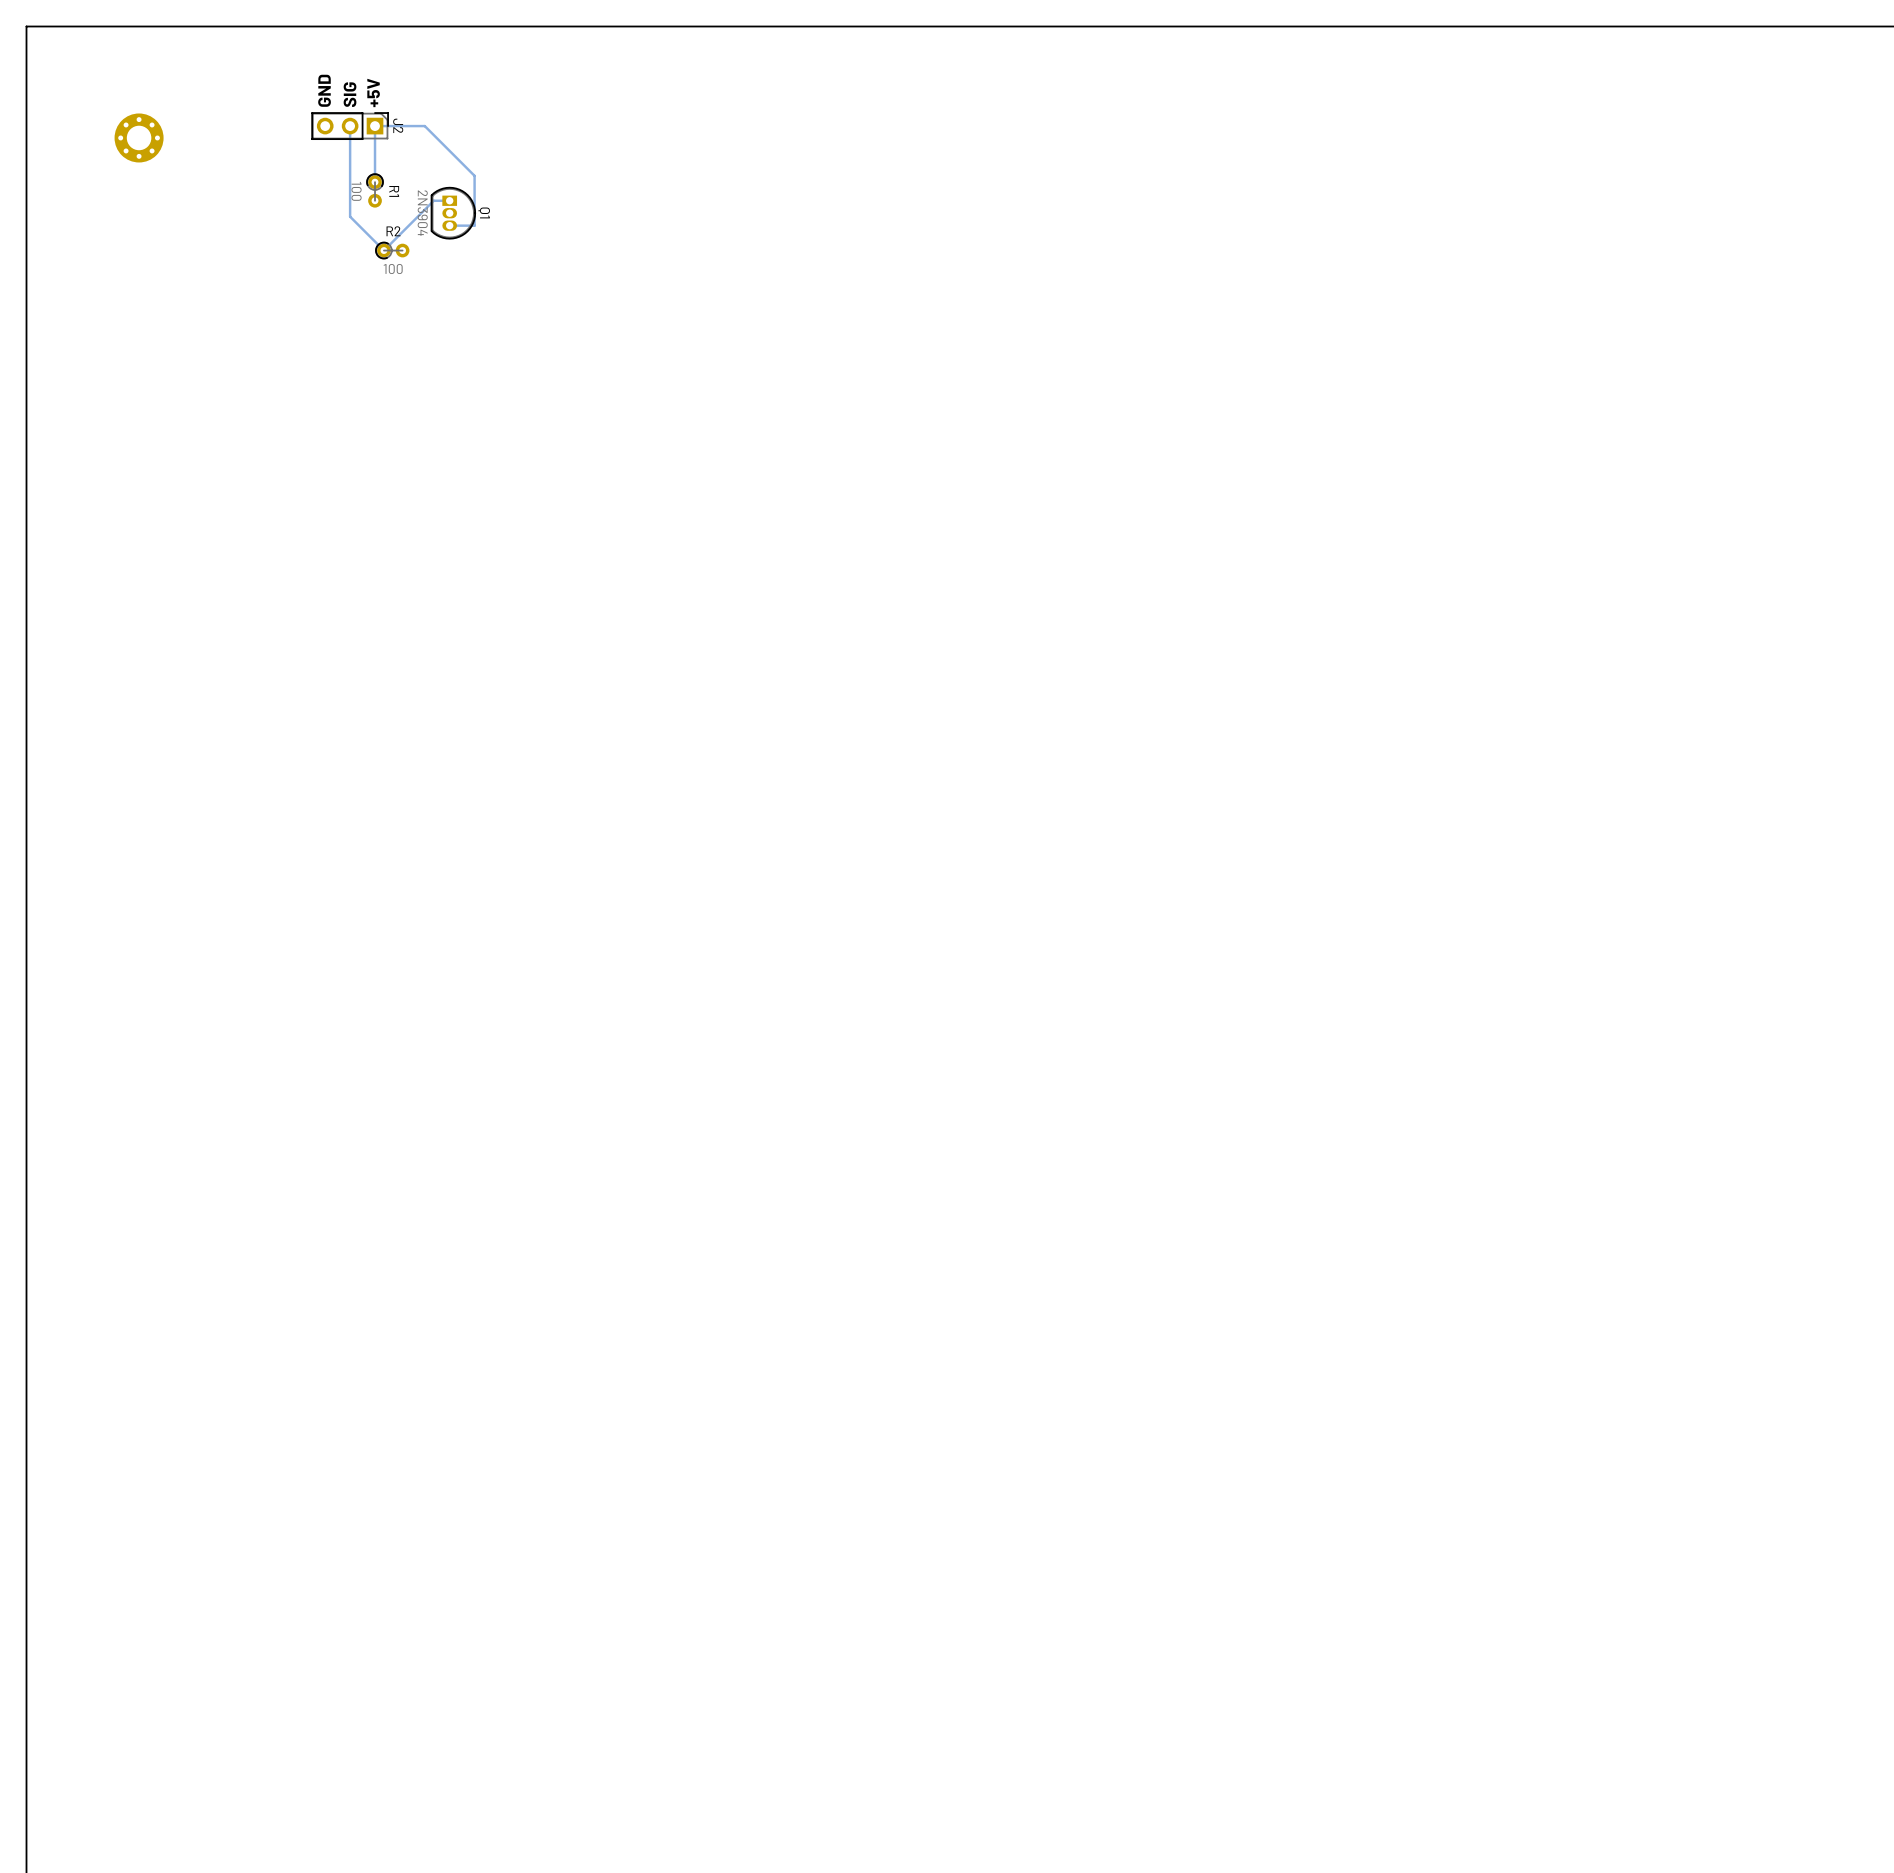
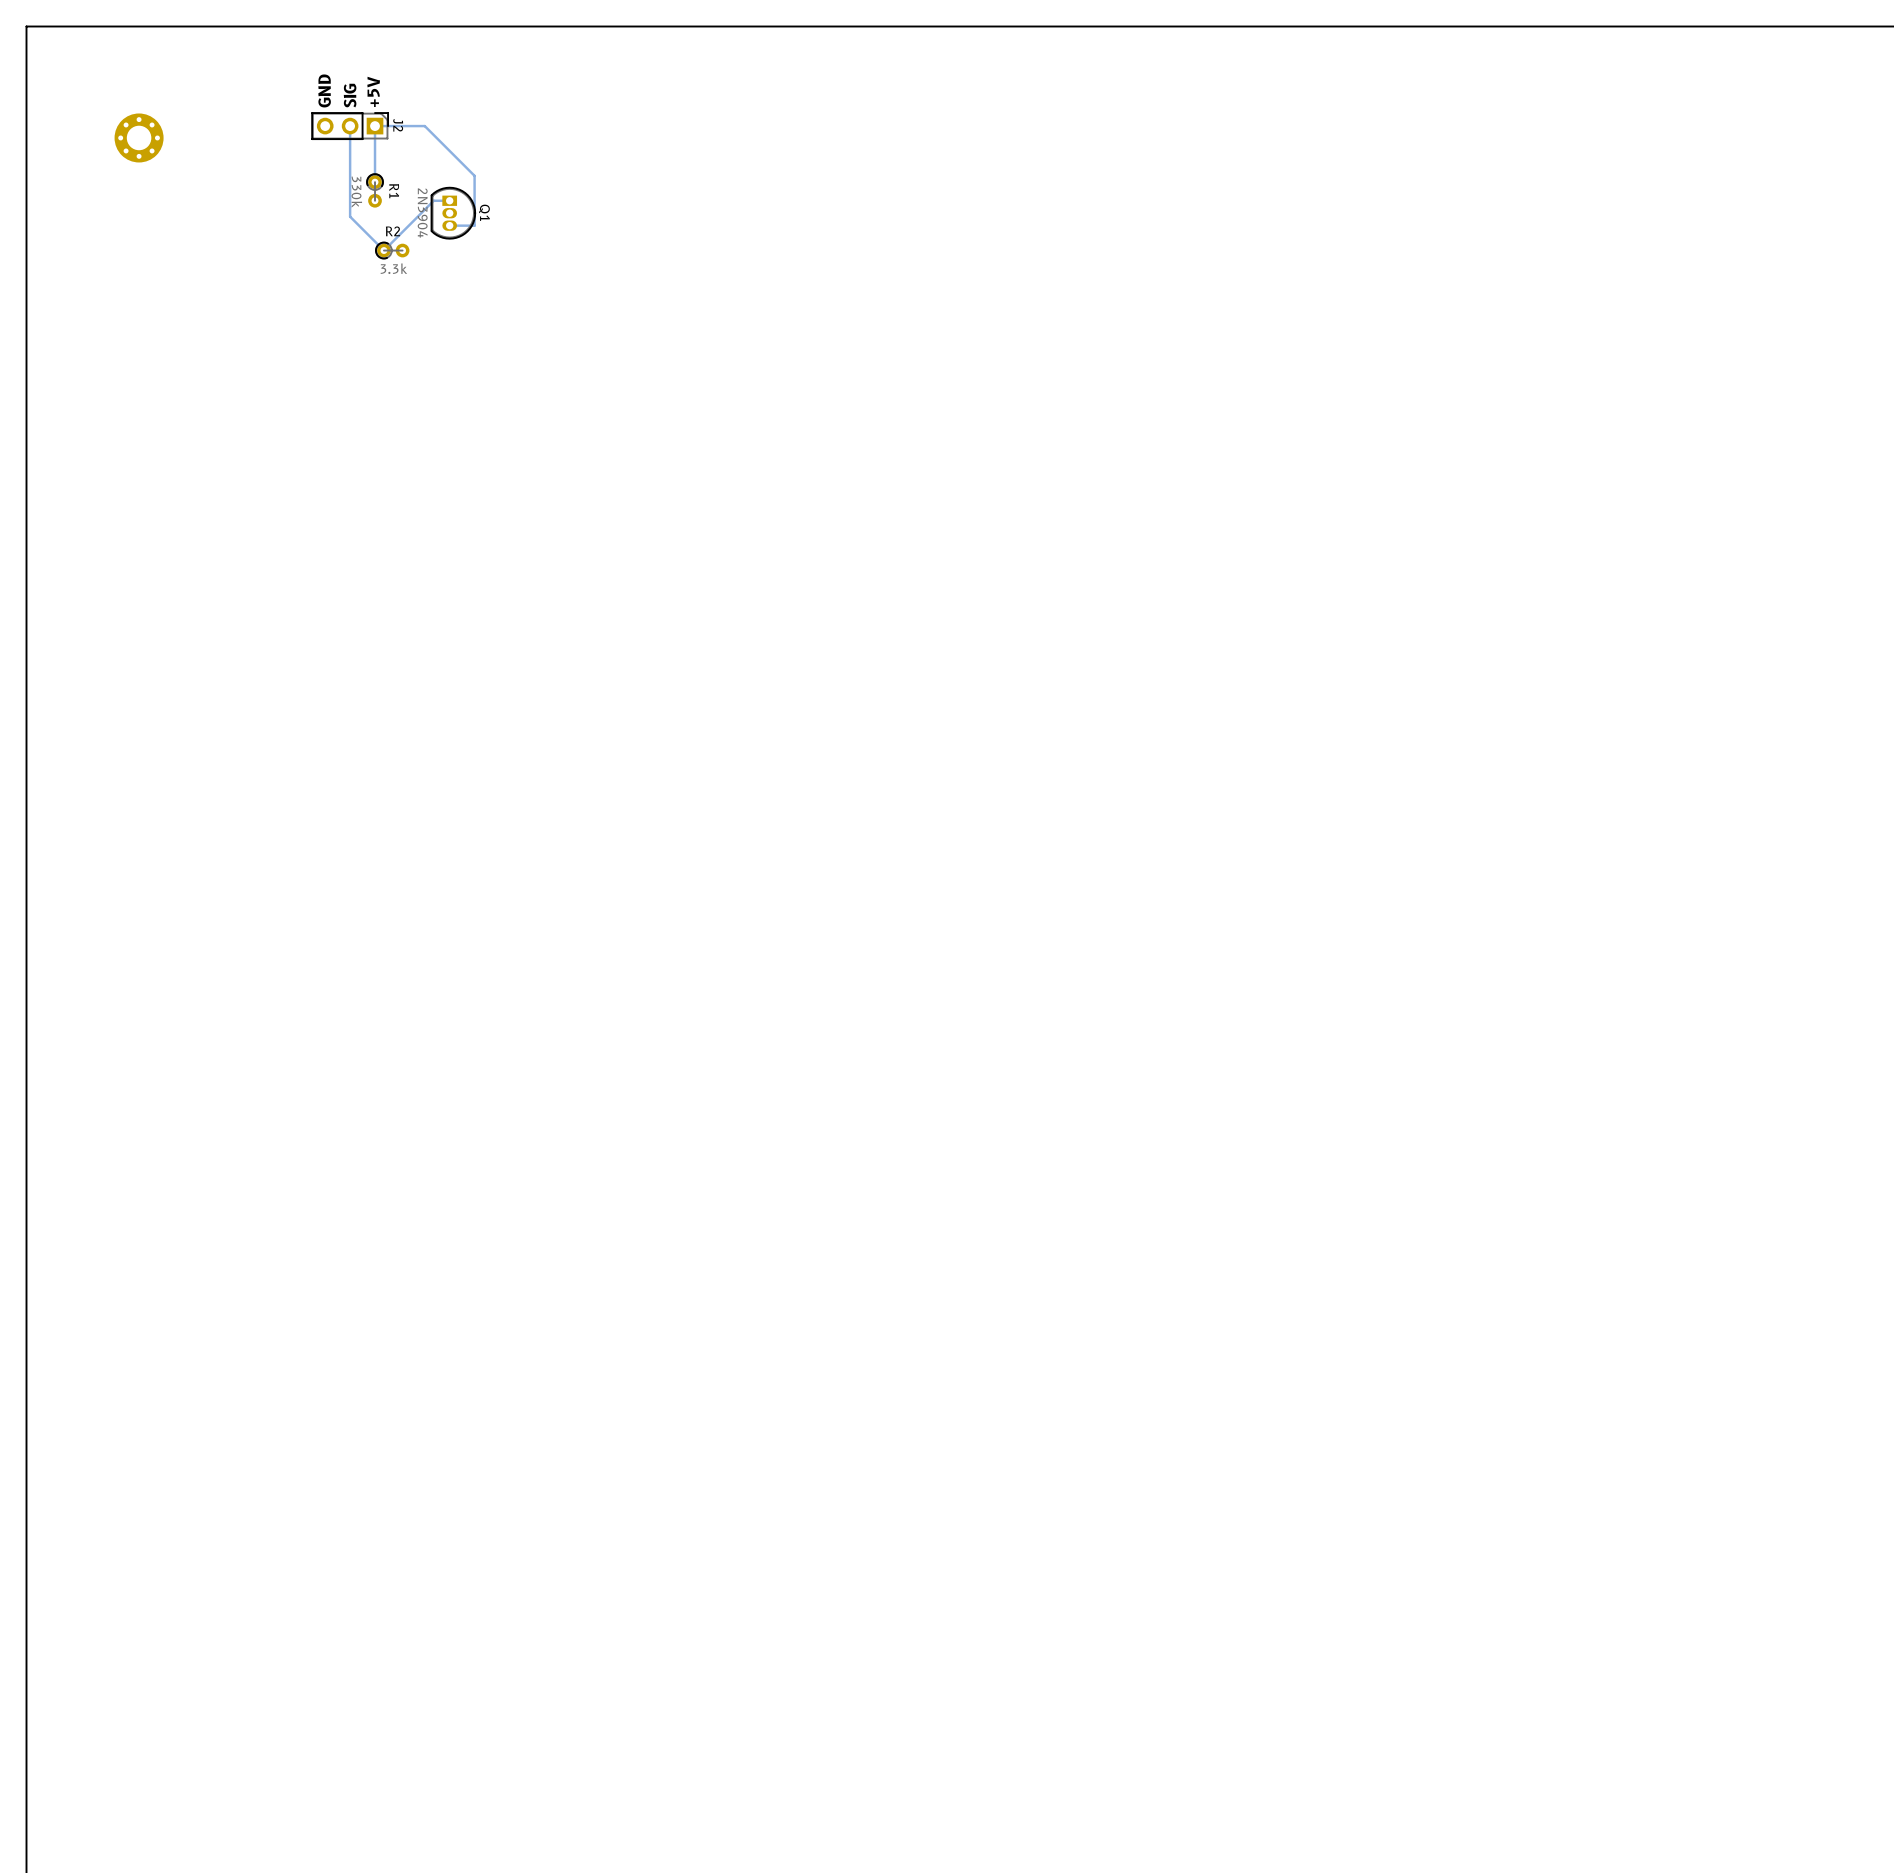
R1 value: 100 (356, 191) -> 330k (356, 192)
R2 value: 100 (393, 269) -> 3.3k (393, 268)

